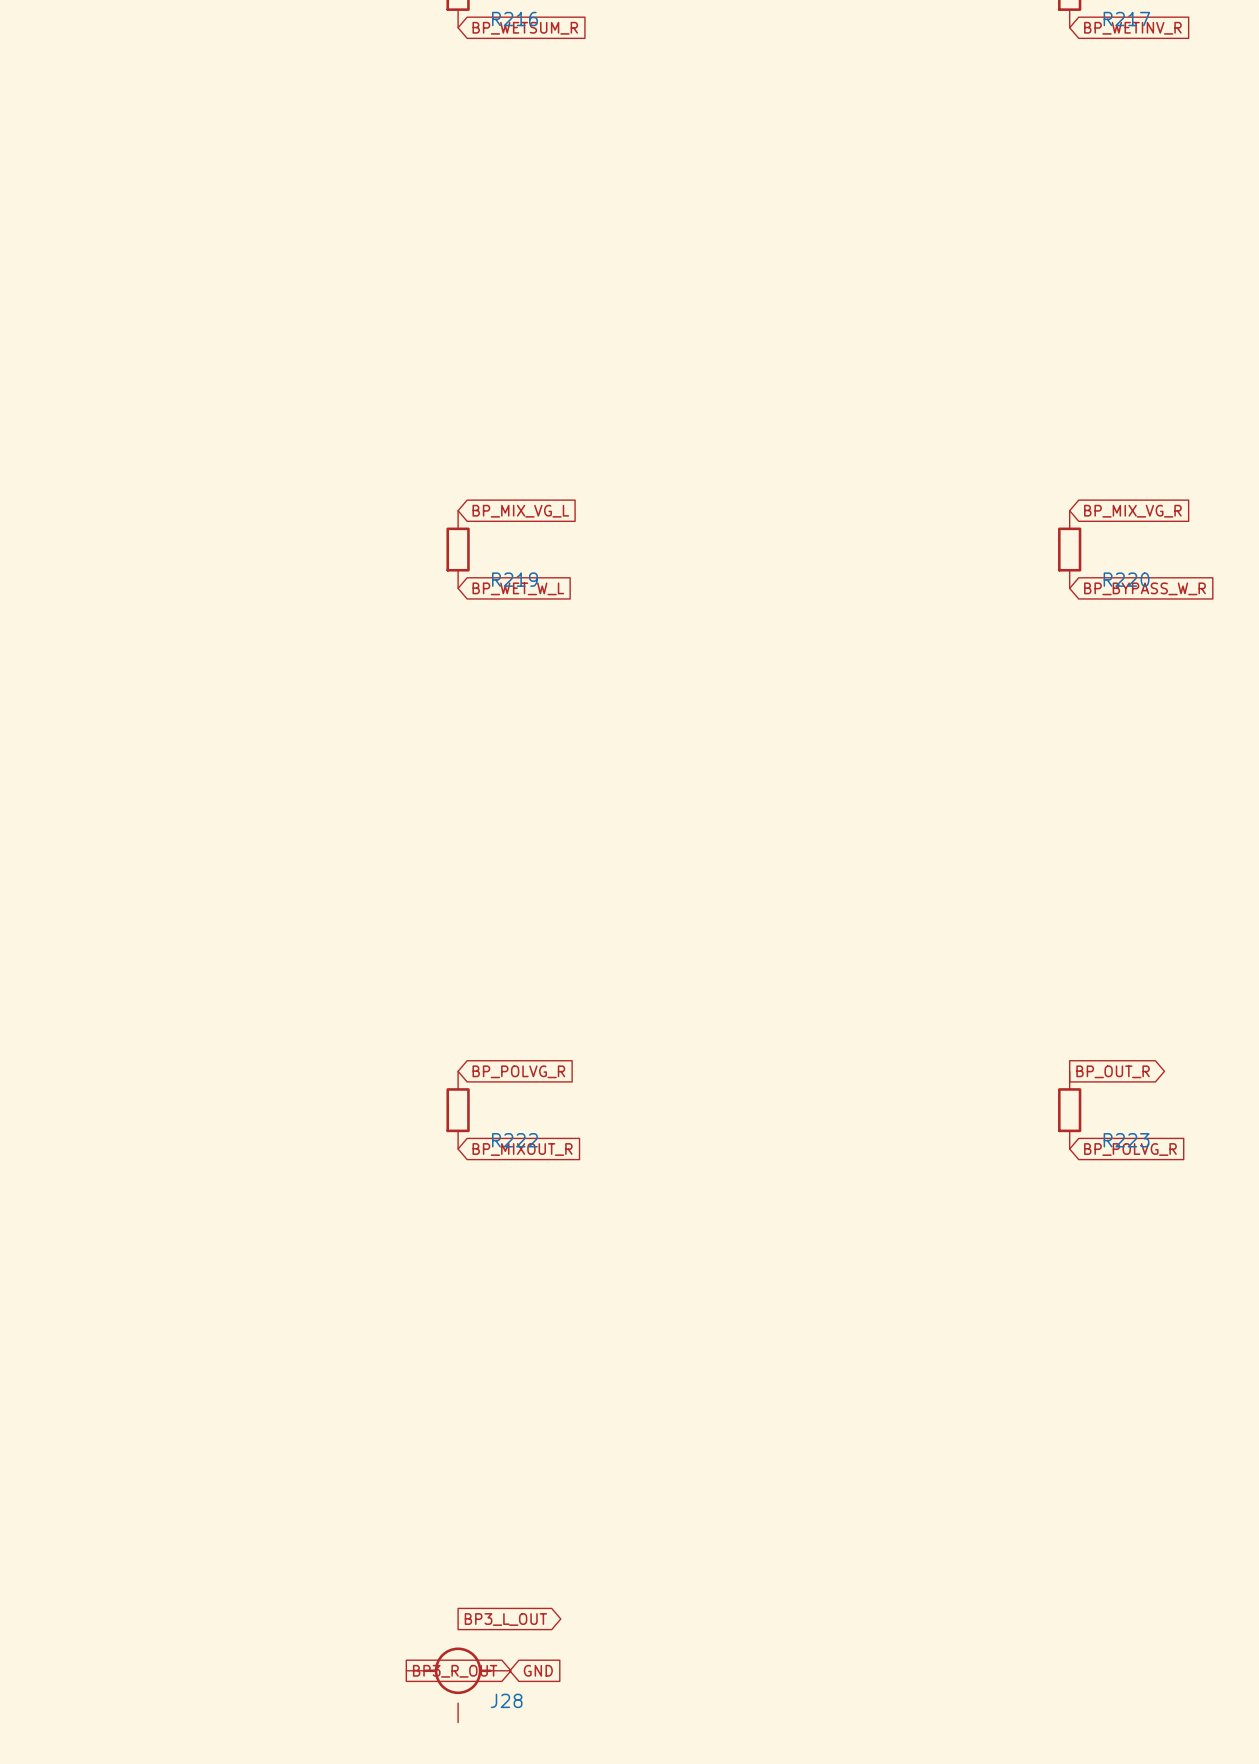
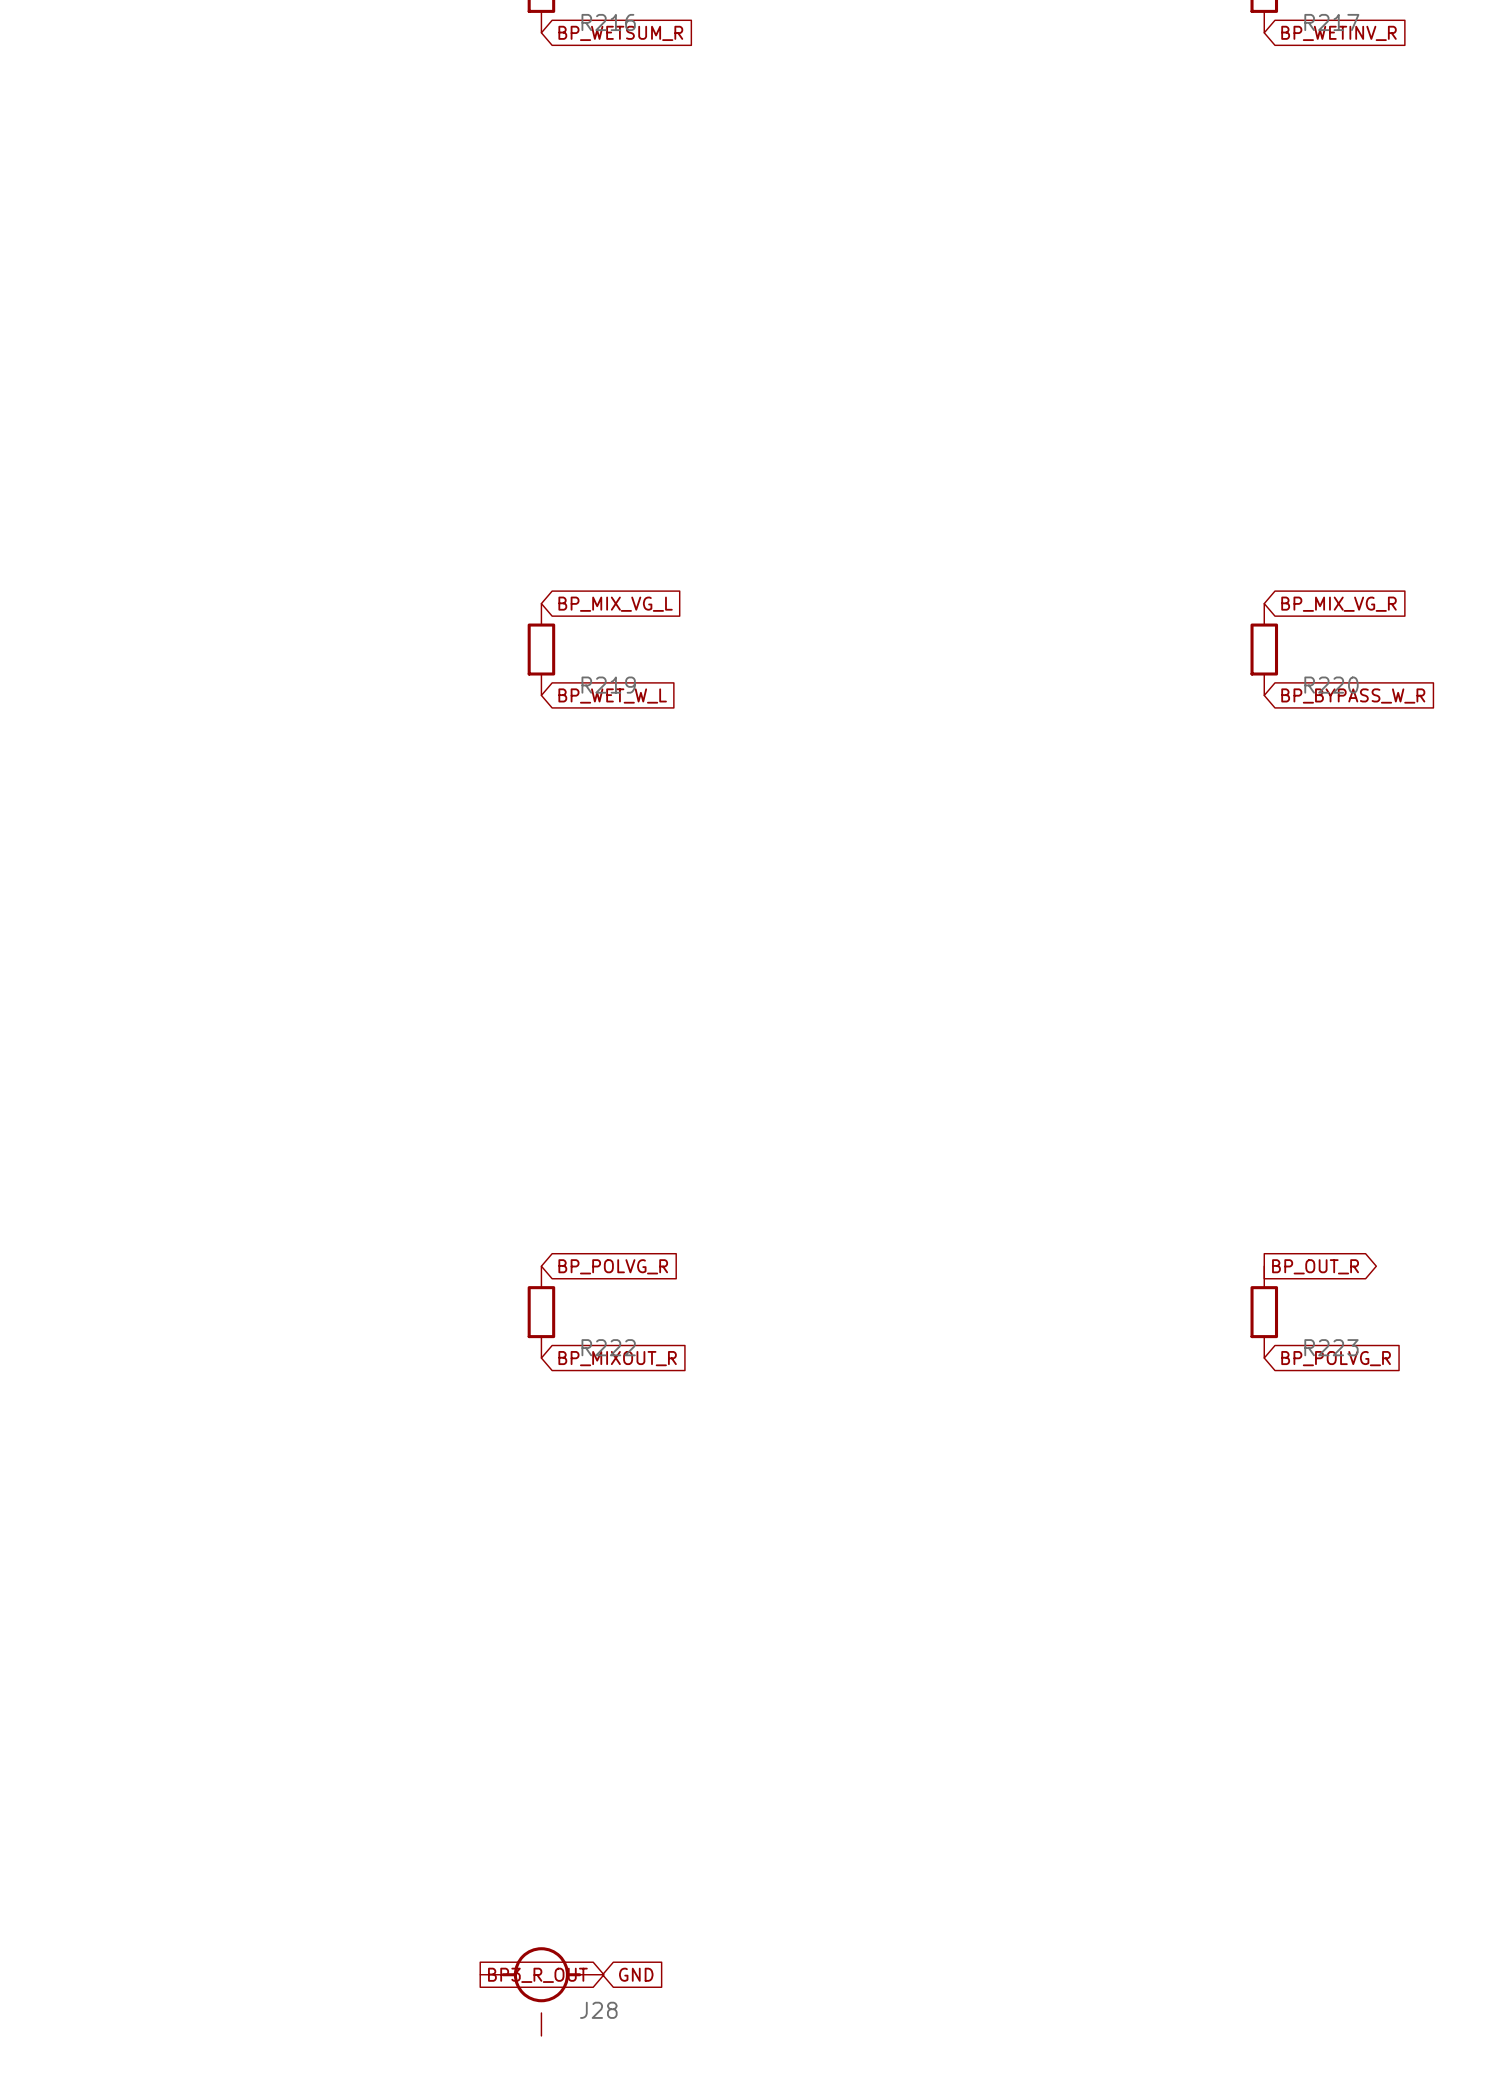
global label: BP3_L_OUT (505, 1619) -> none

